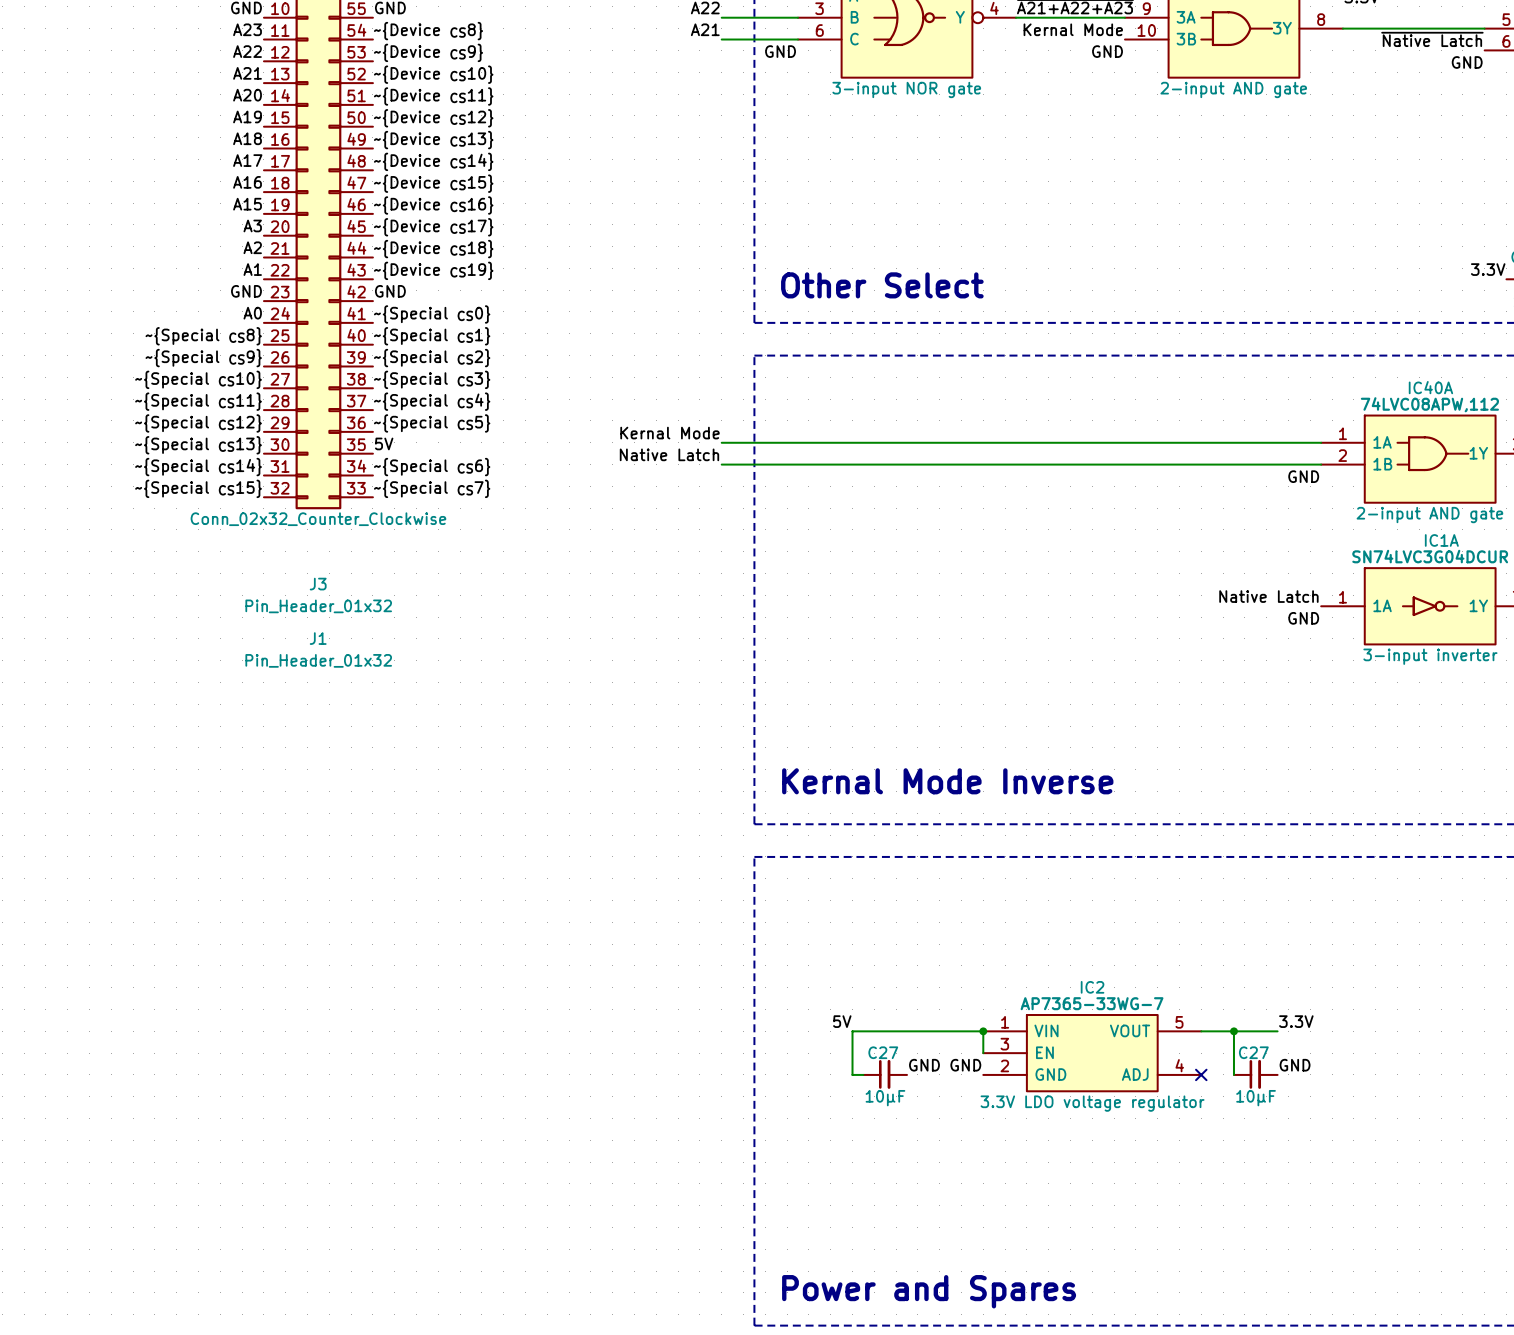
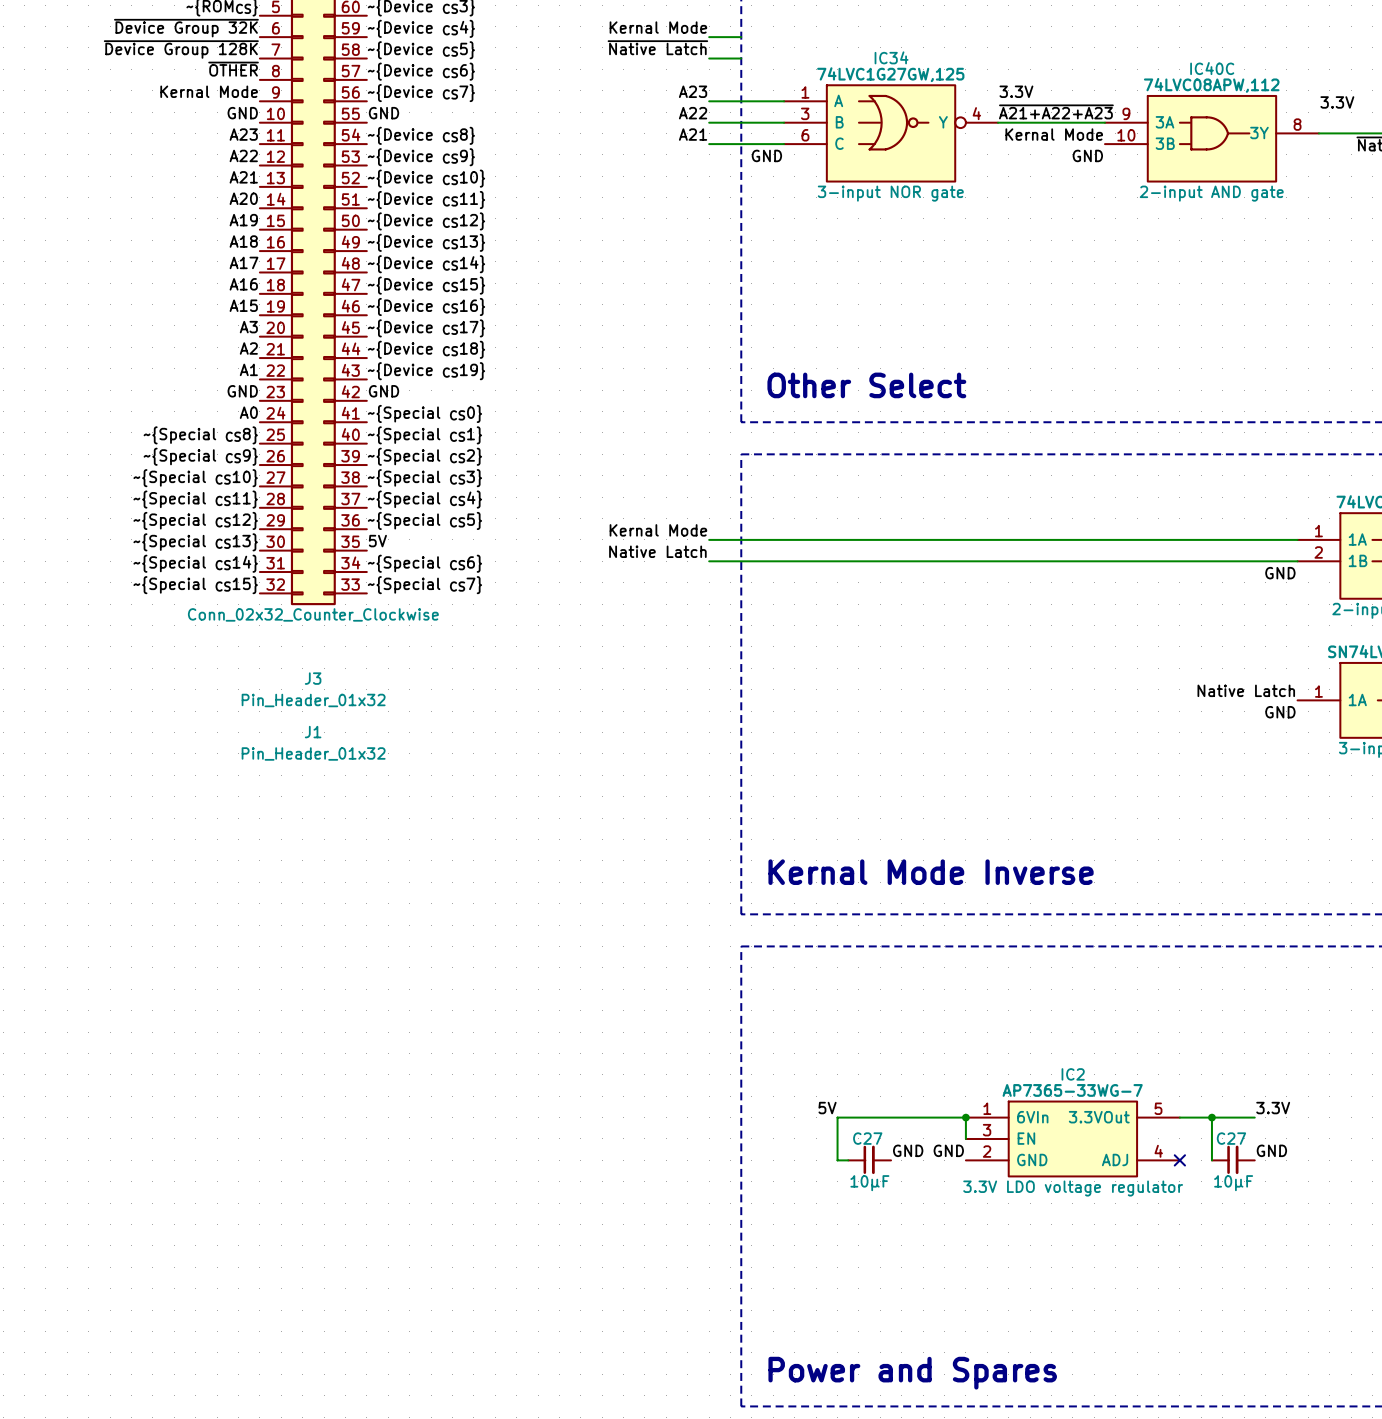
IC2 pin name: VIN (1046, 1030) -> 6VIn (1032, 1117)
IC2 pin name: VOUT (1130, 1030) -> 3.3VOut (1099, 1117)

